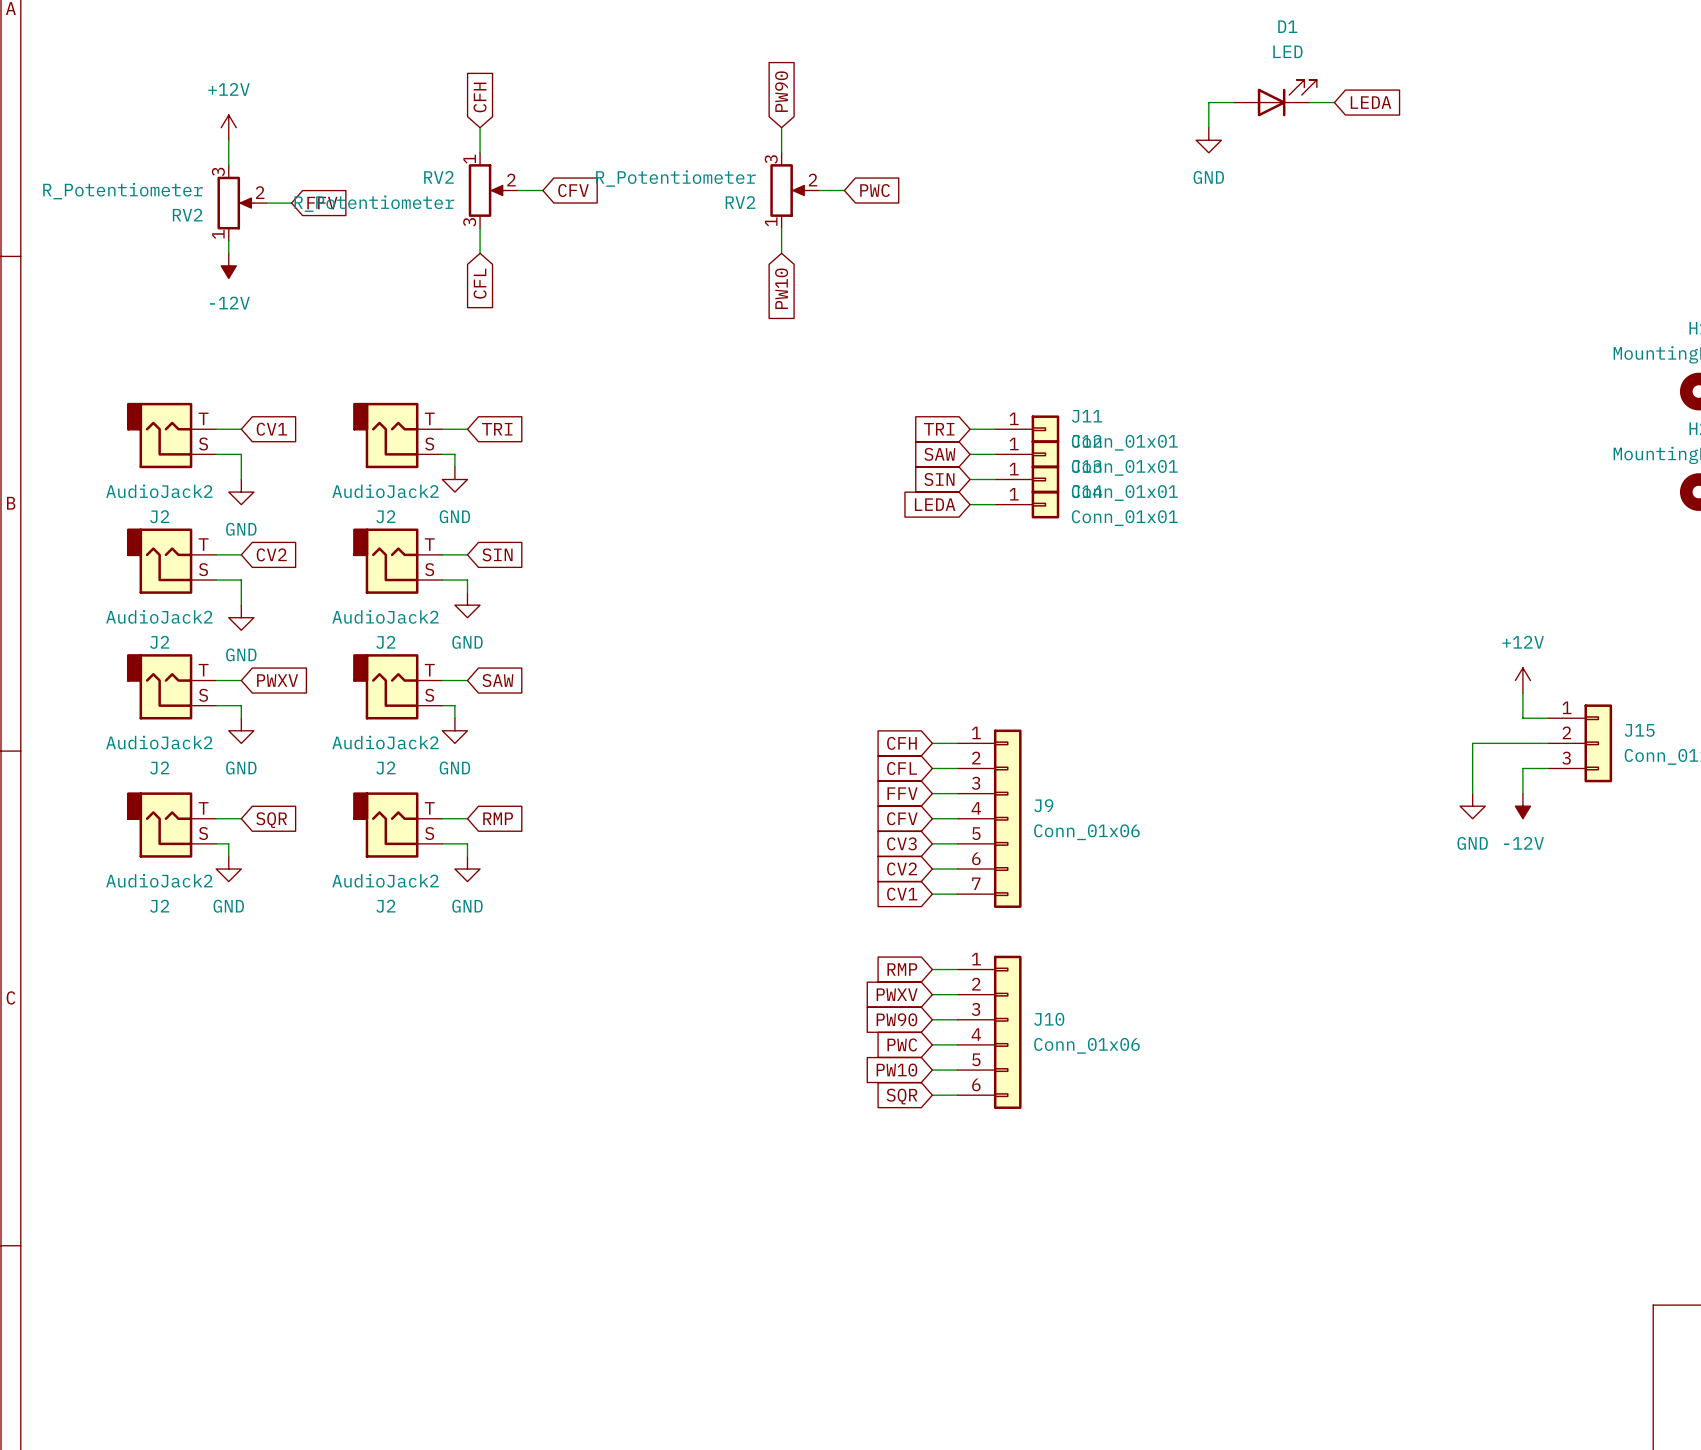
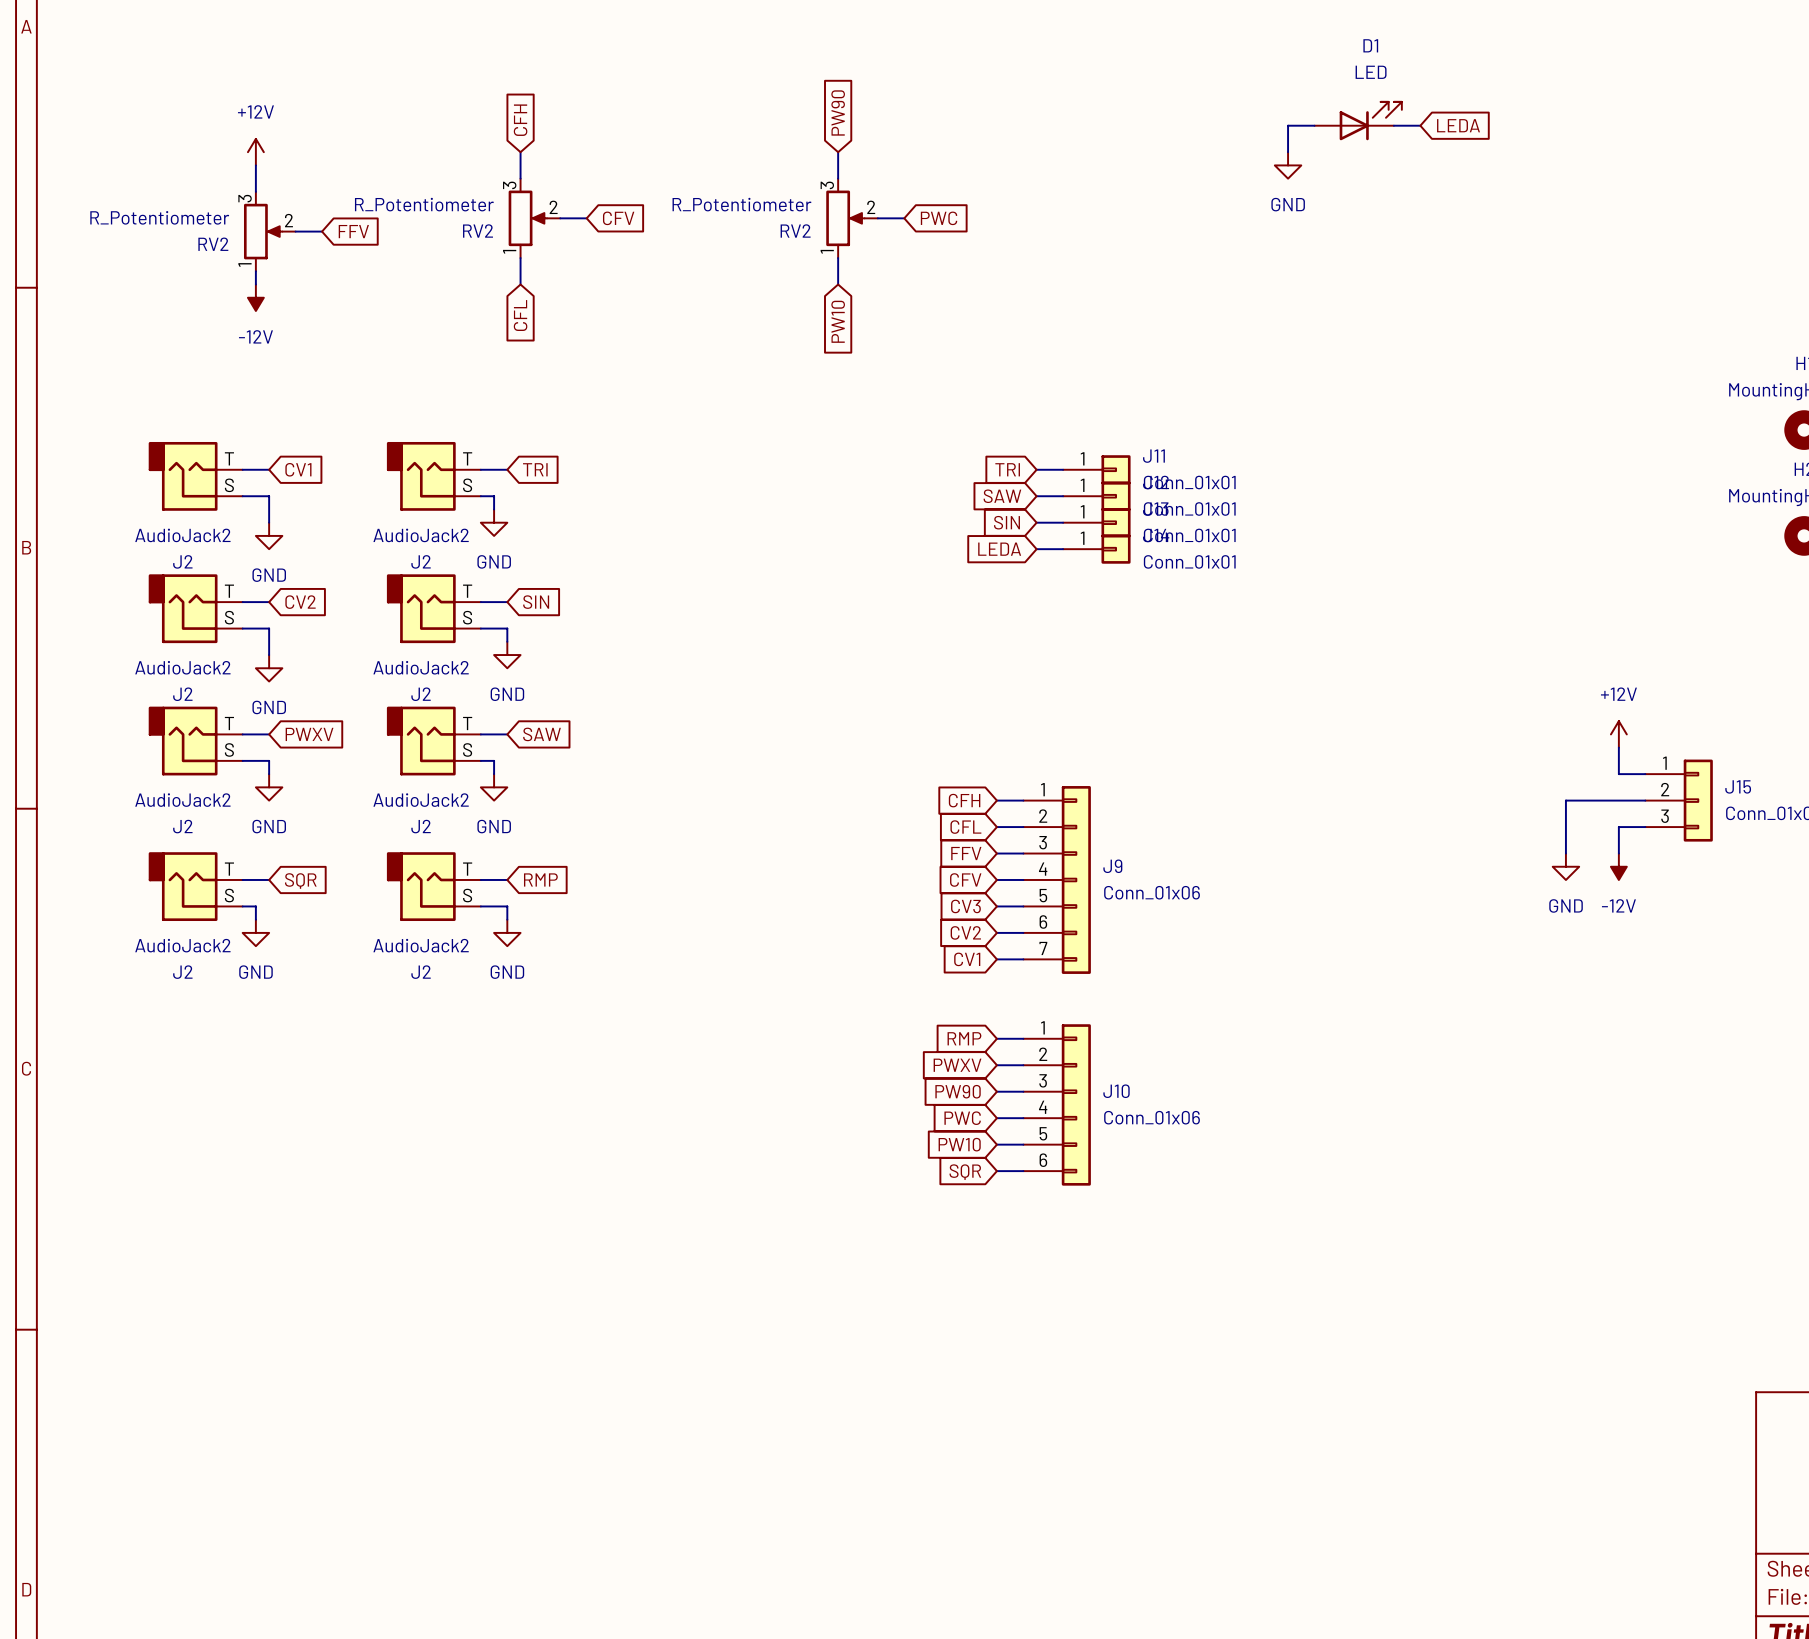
RV2 flip: as is (486, 190) -> up-down (527, 218)

